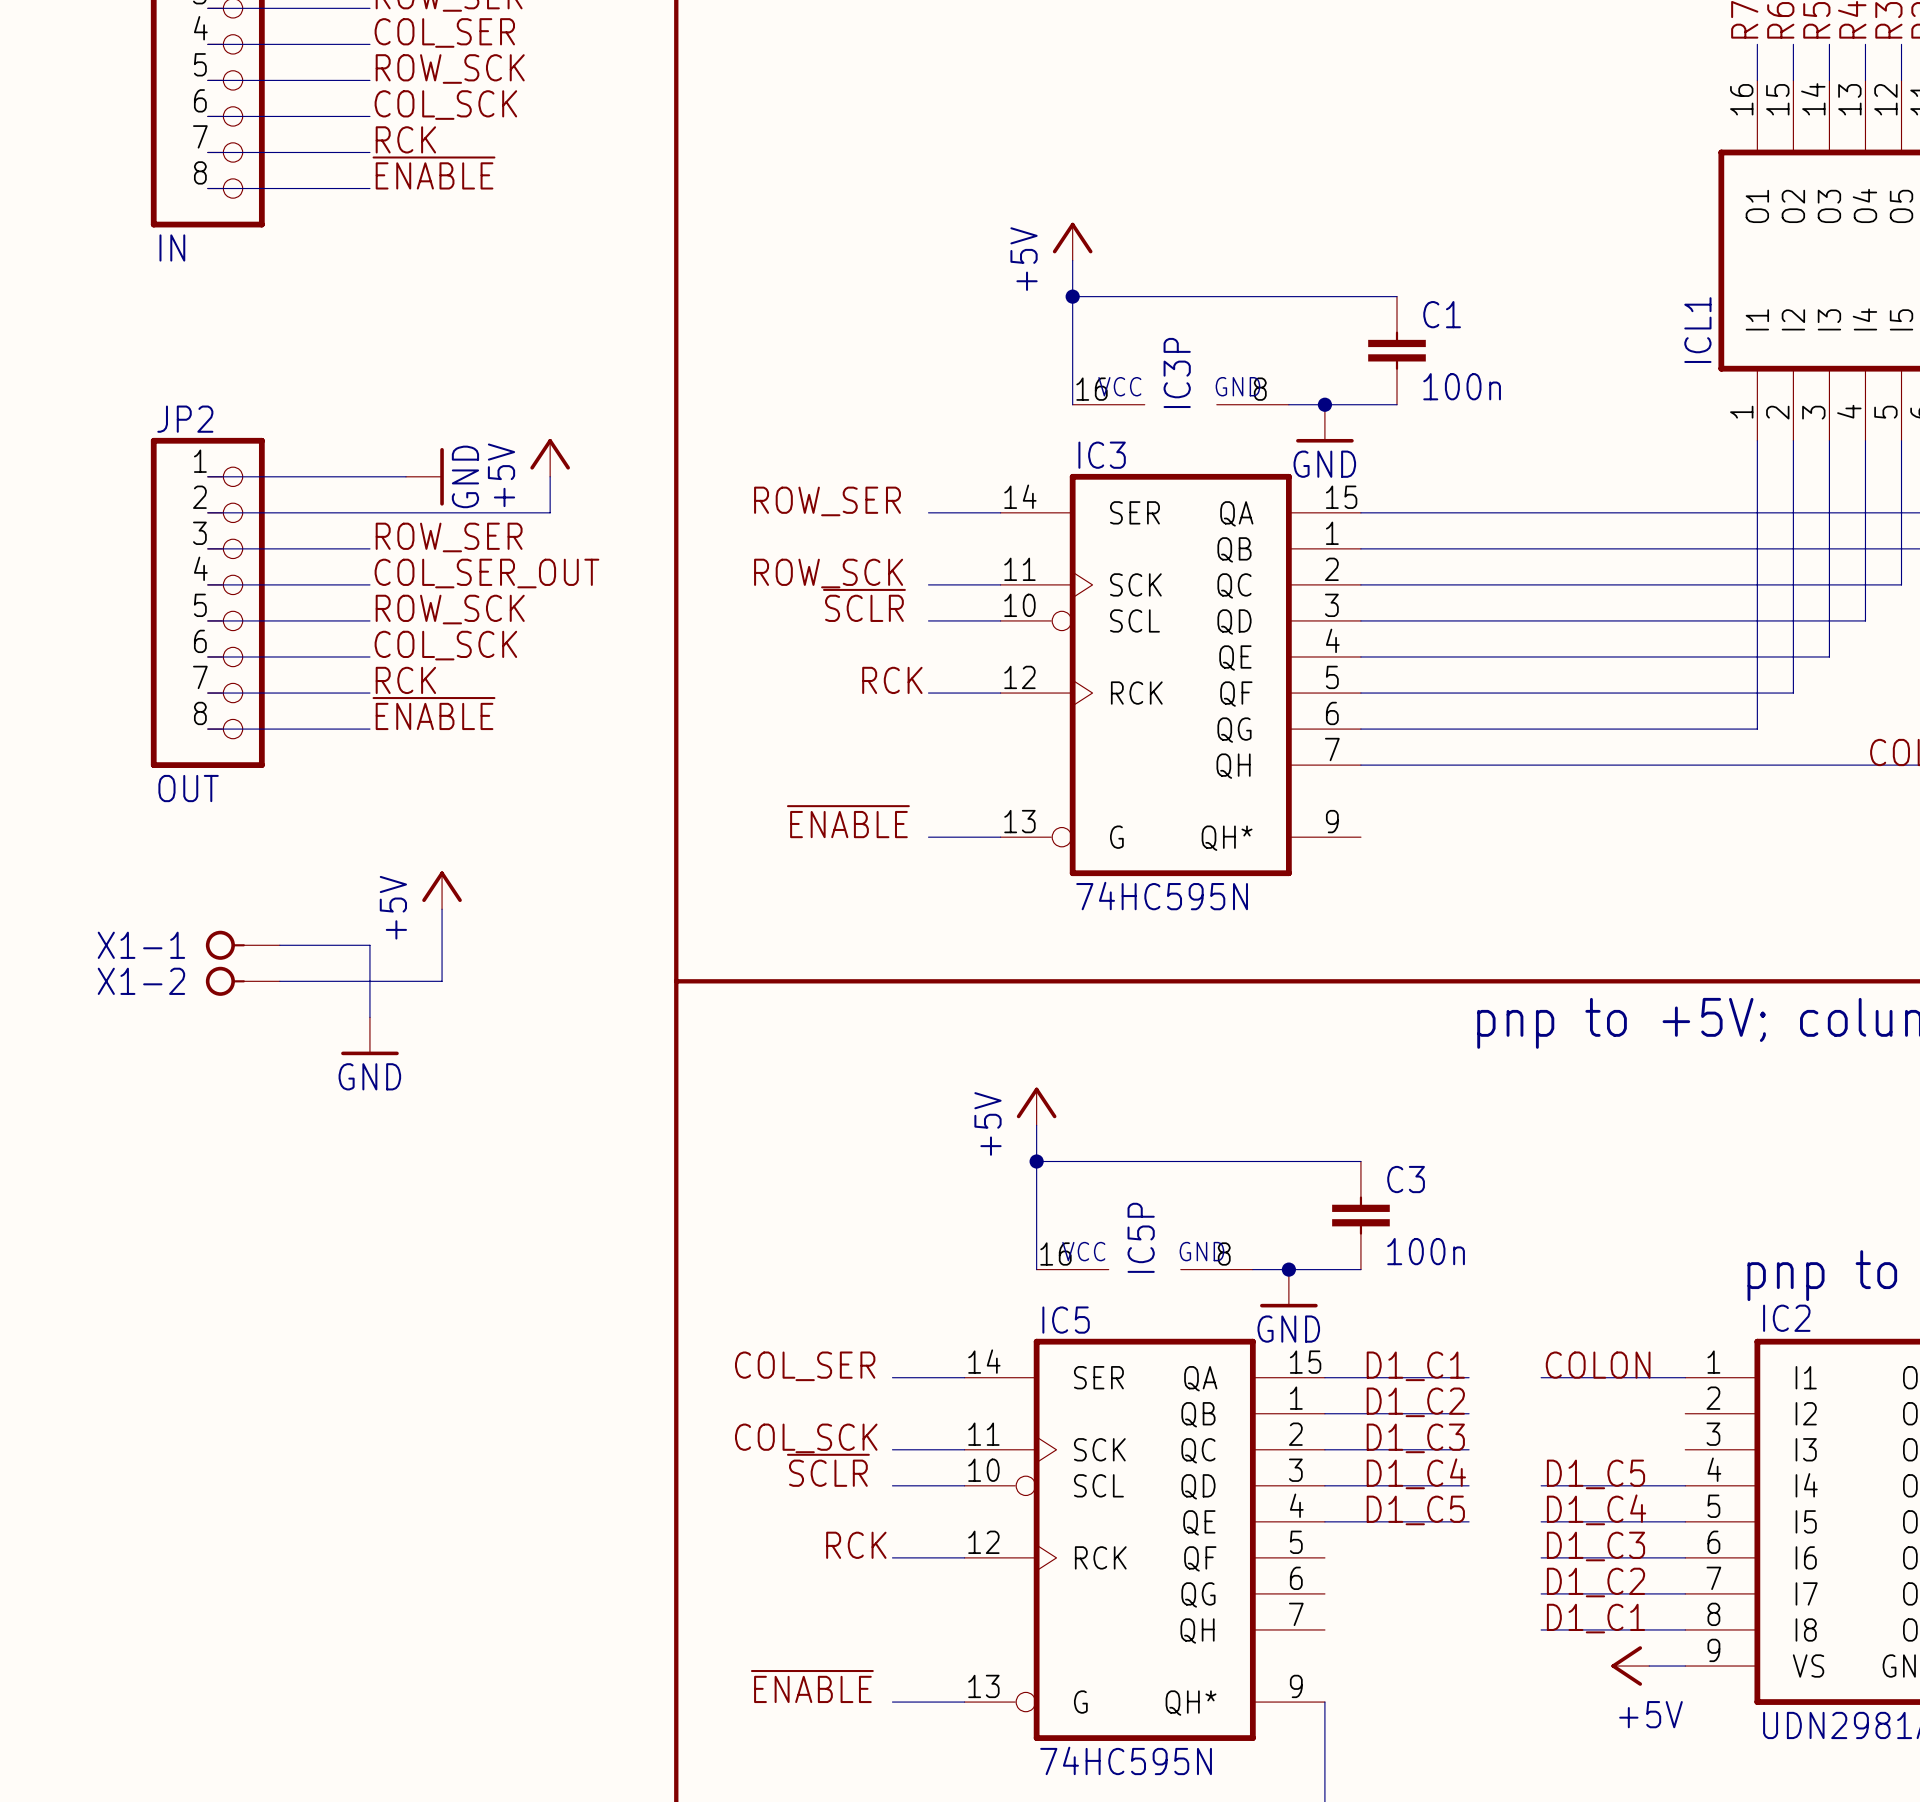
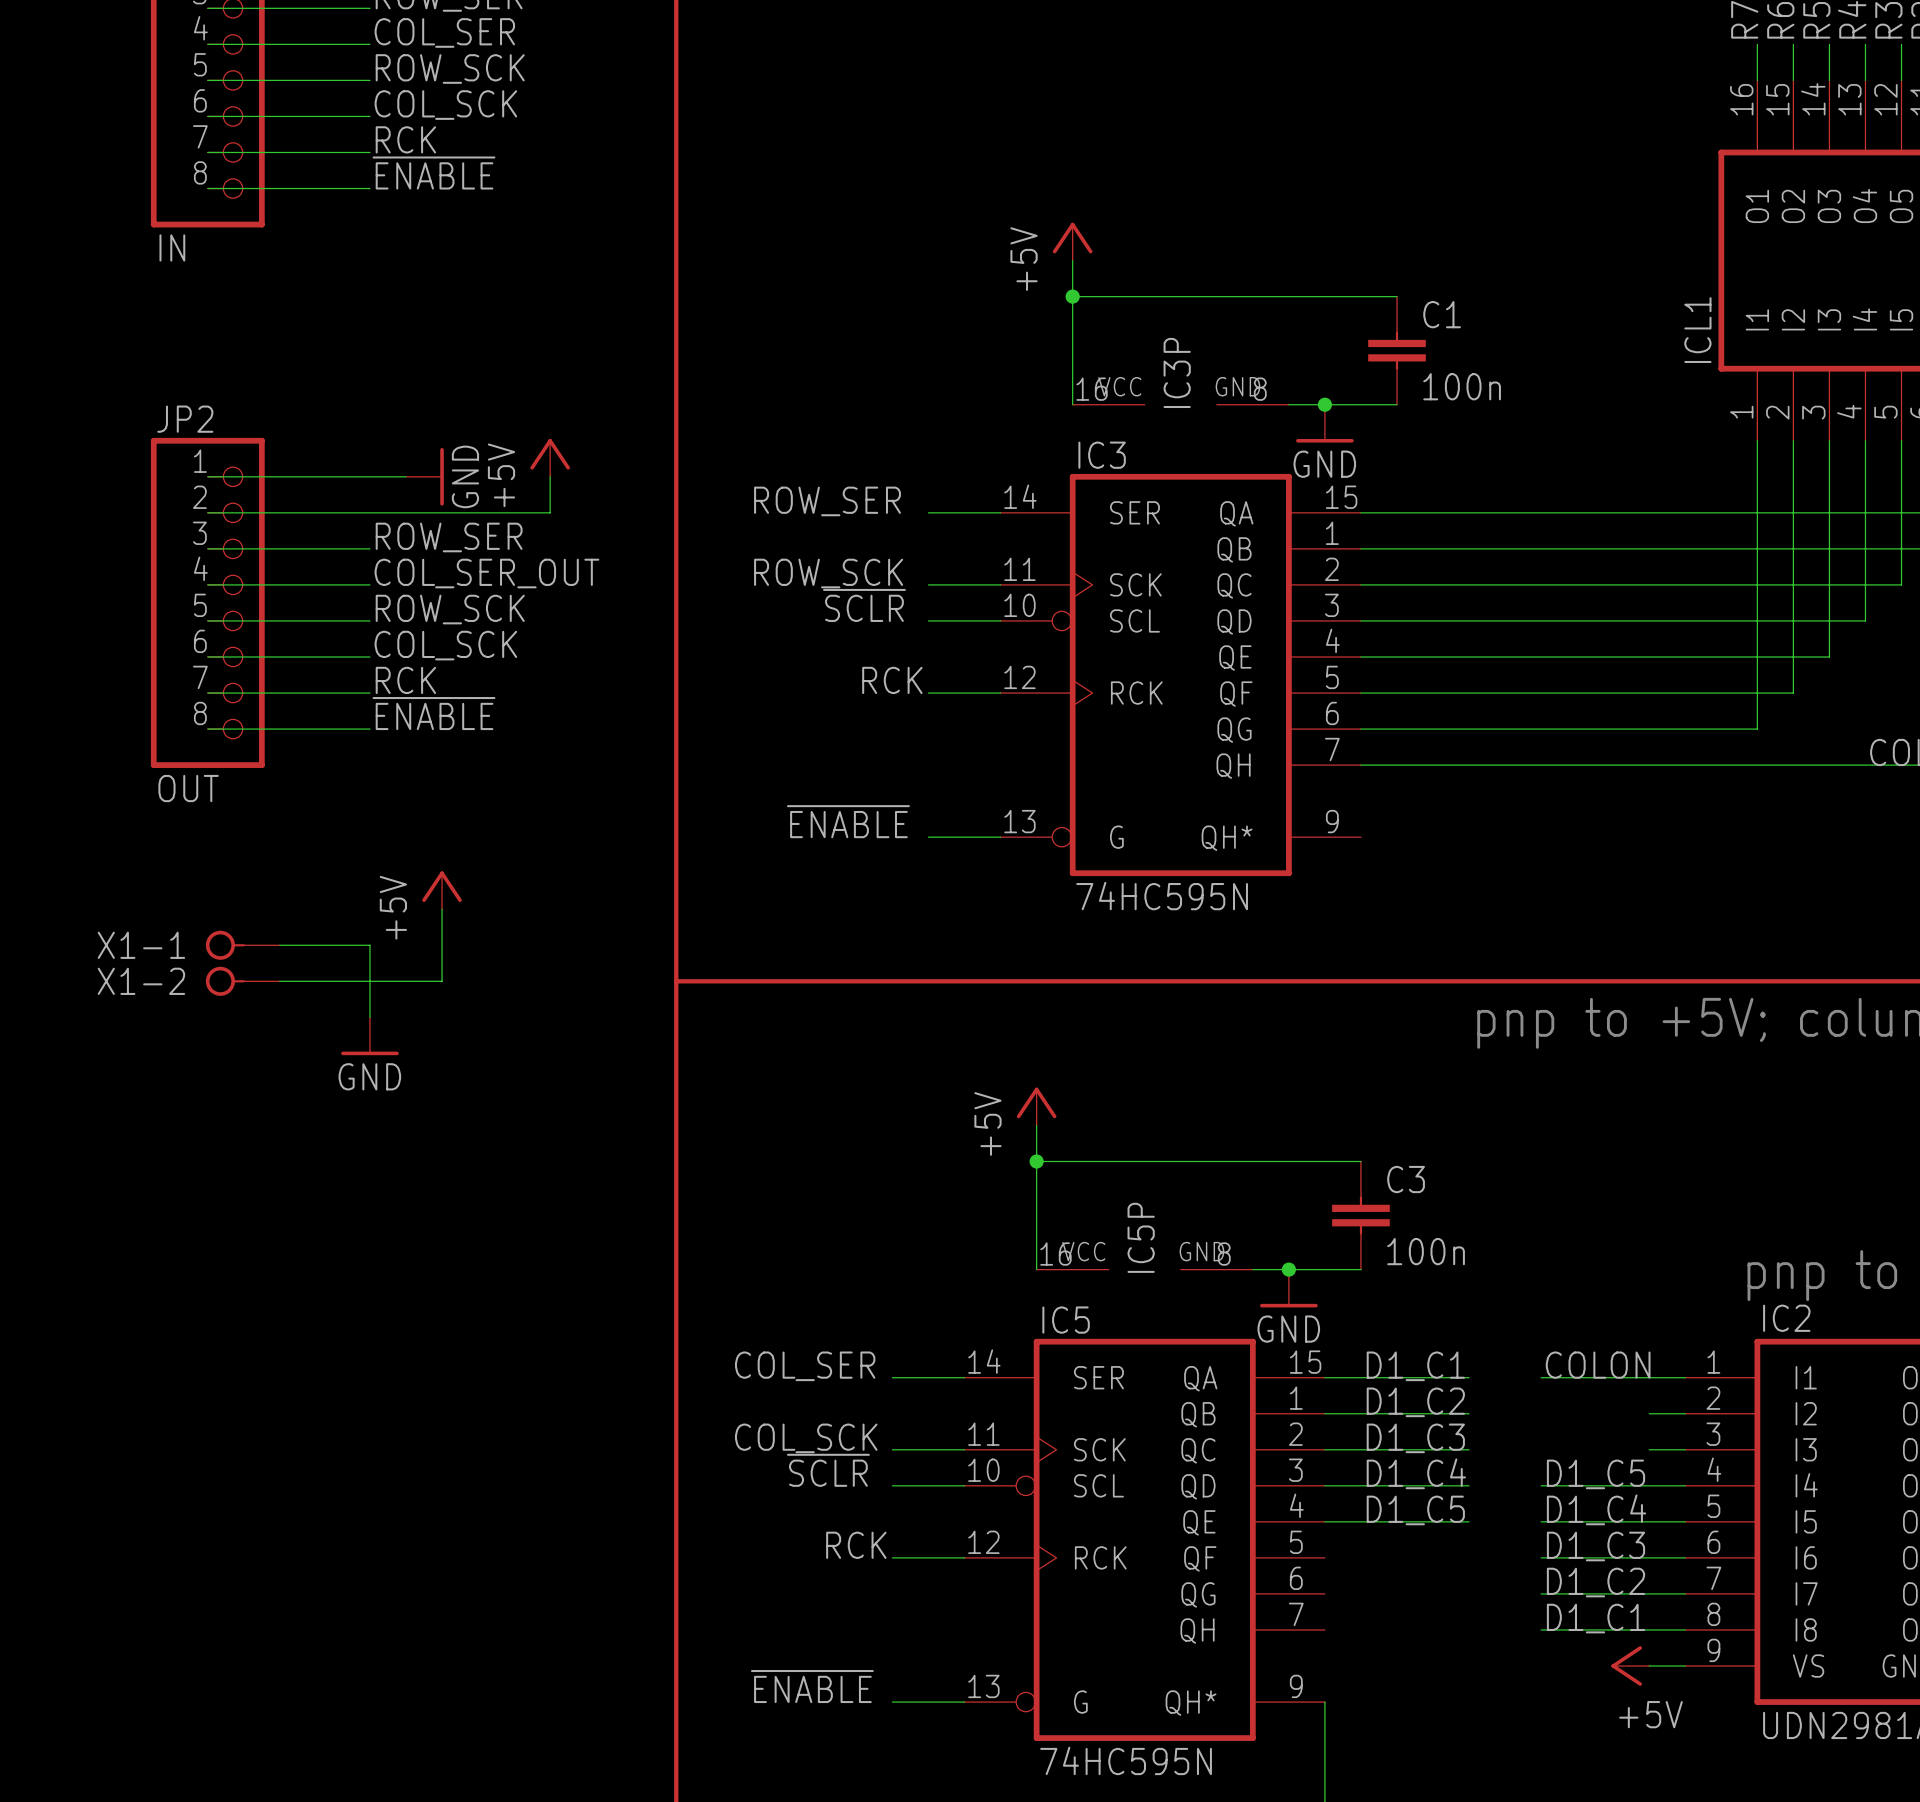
wire: none -> (1649, 1413) (1685, 1413)
wire: none -> (1649, 1449) (1685, 1449)

